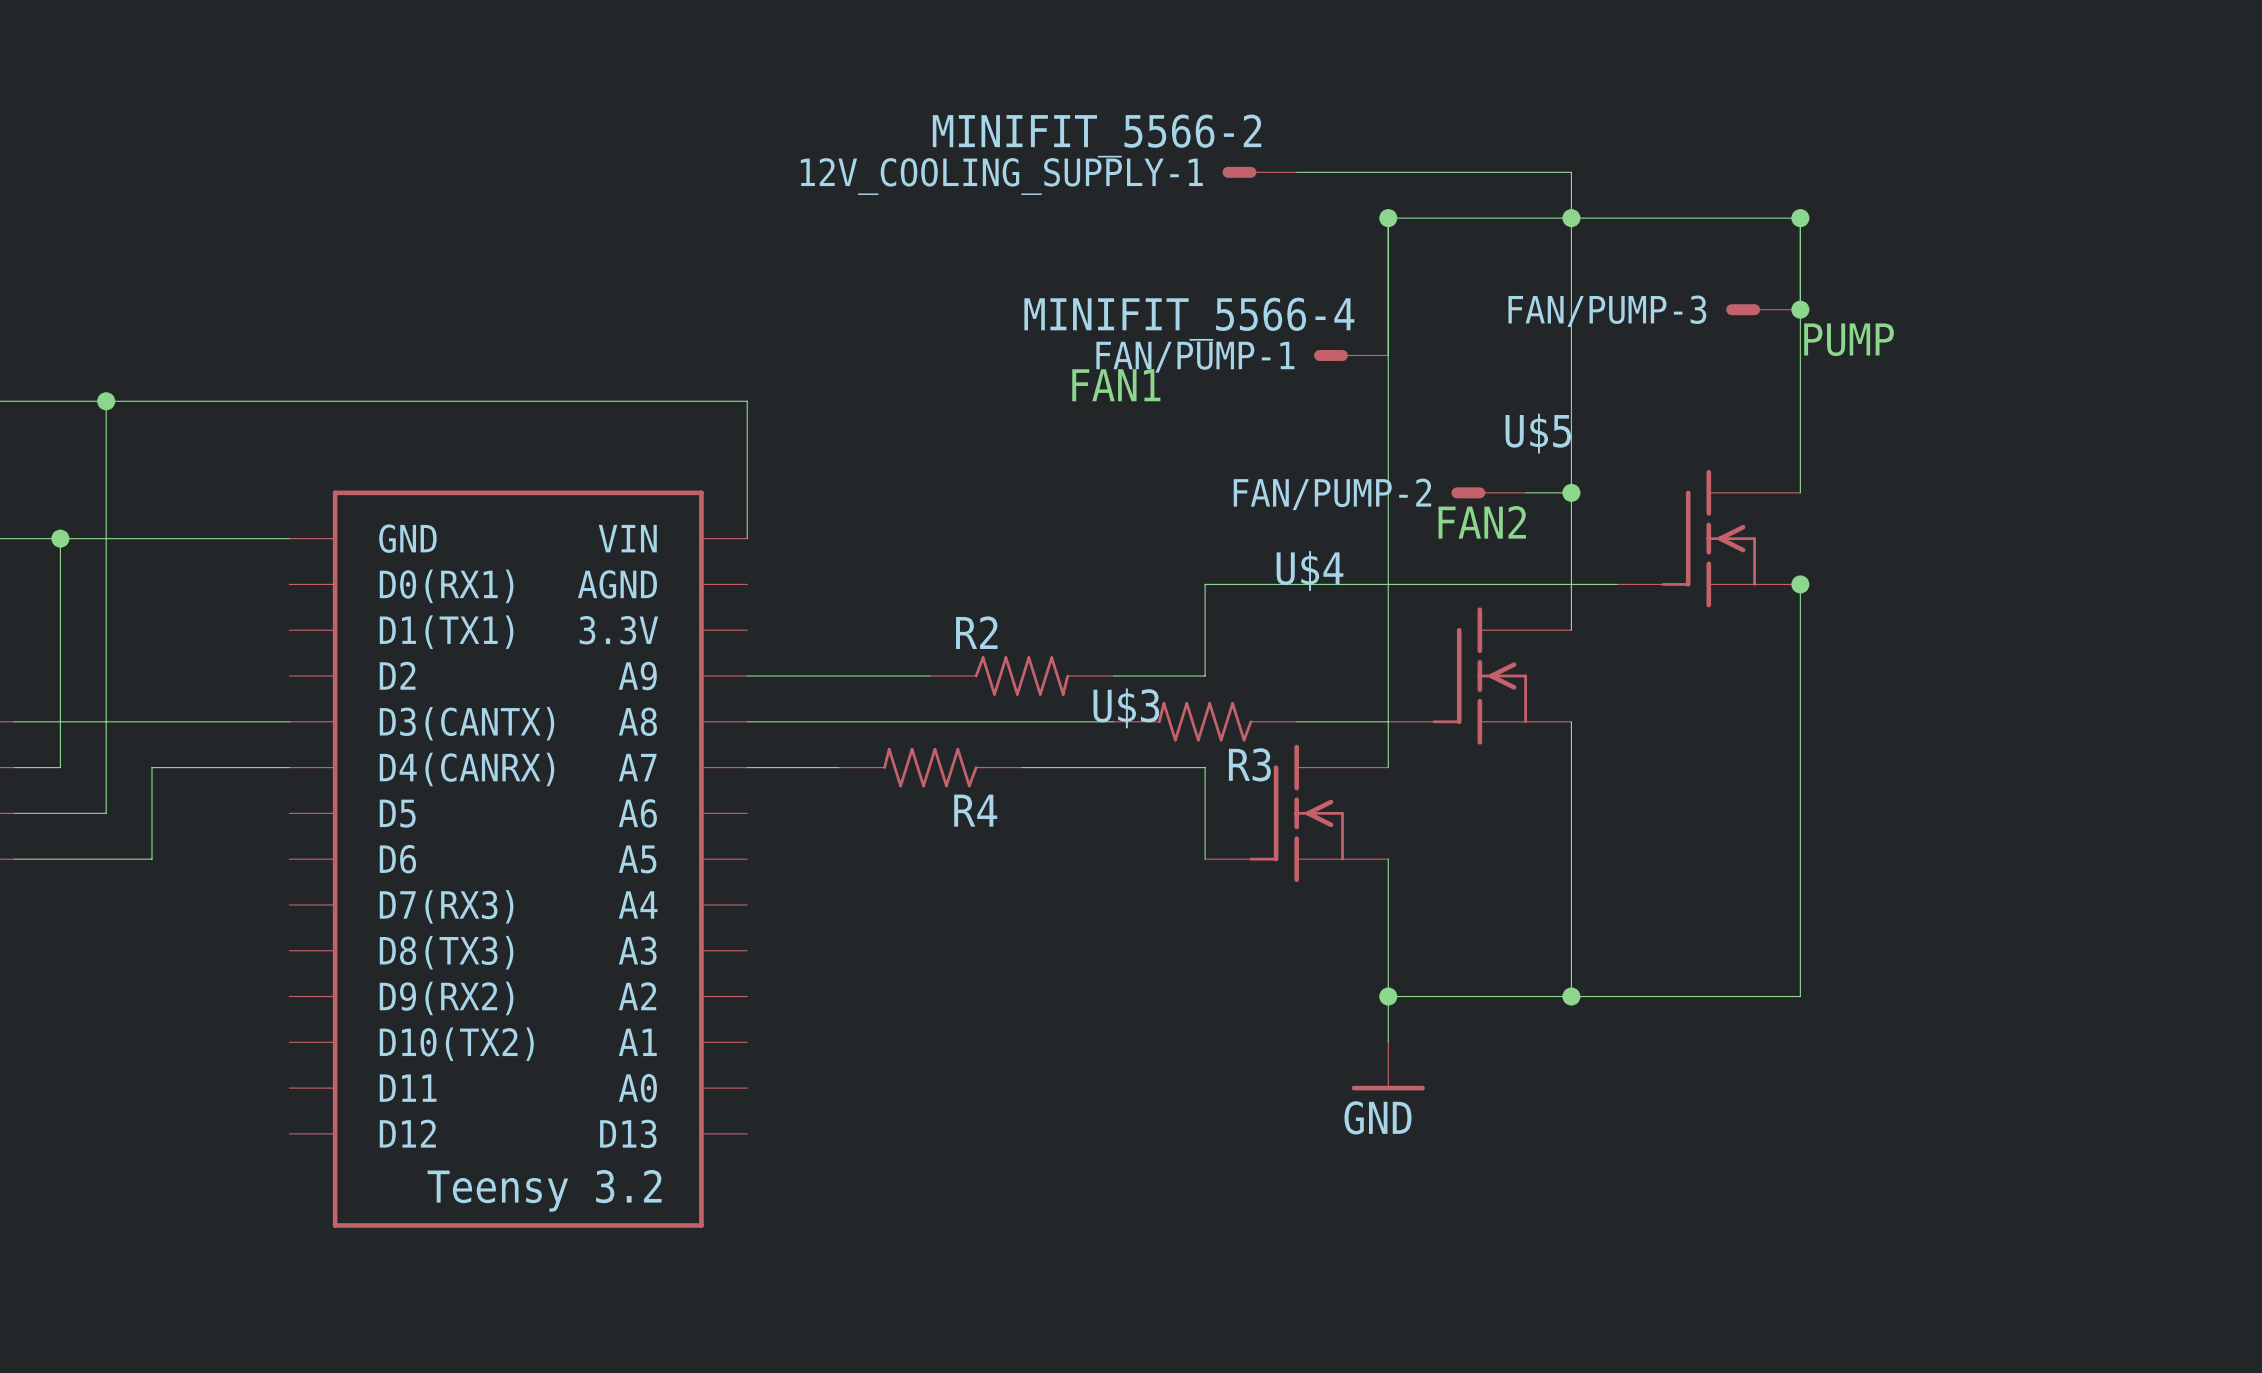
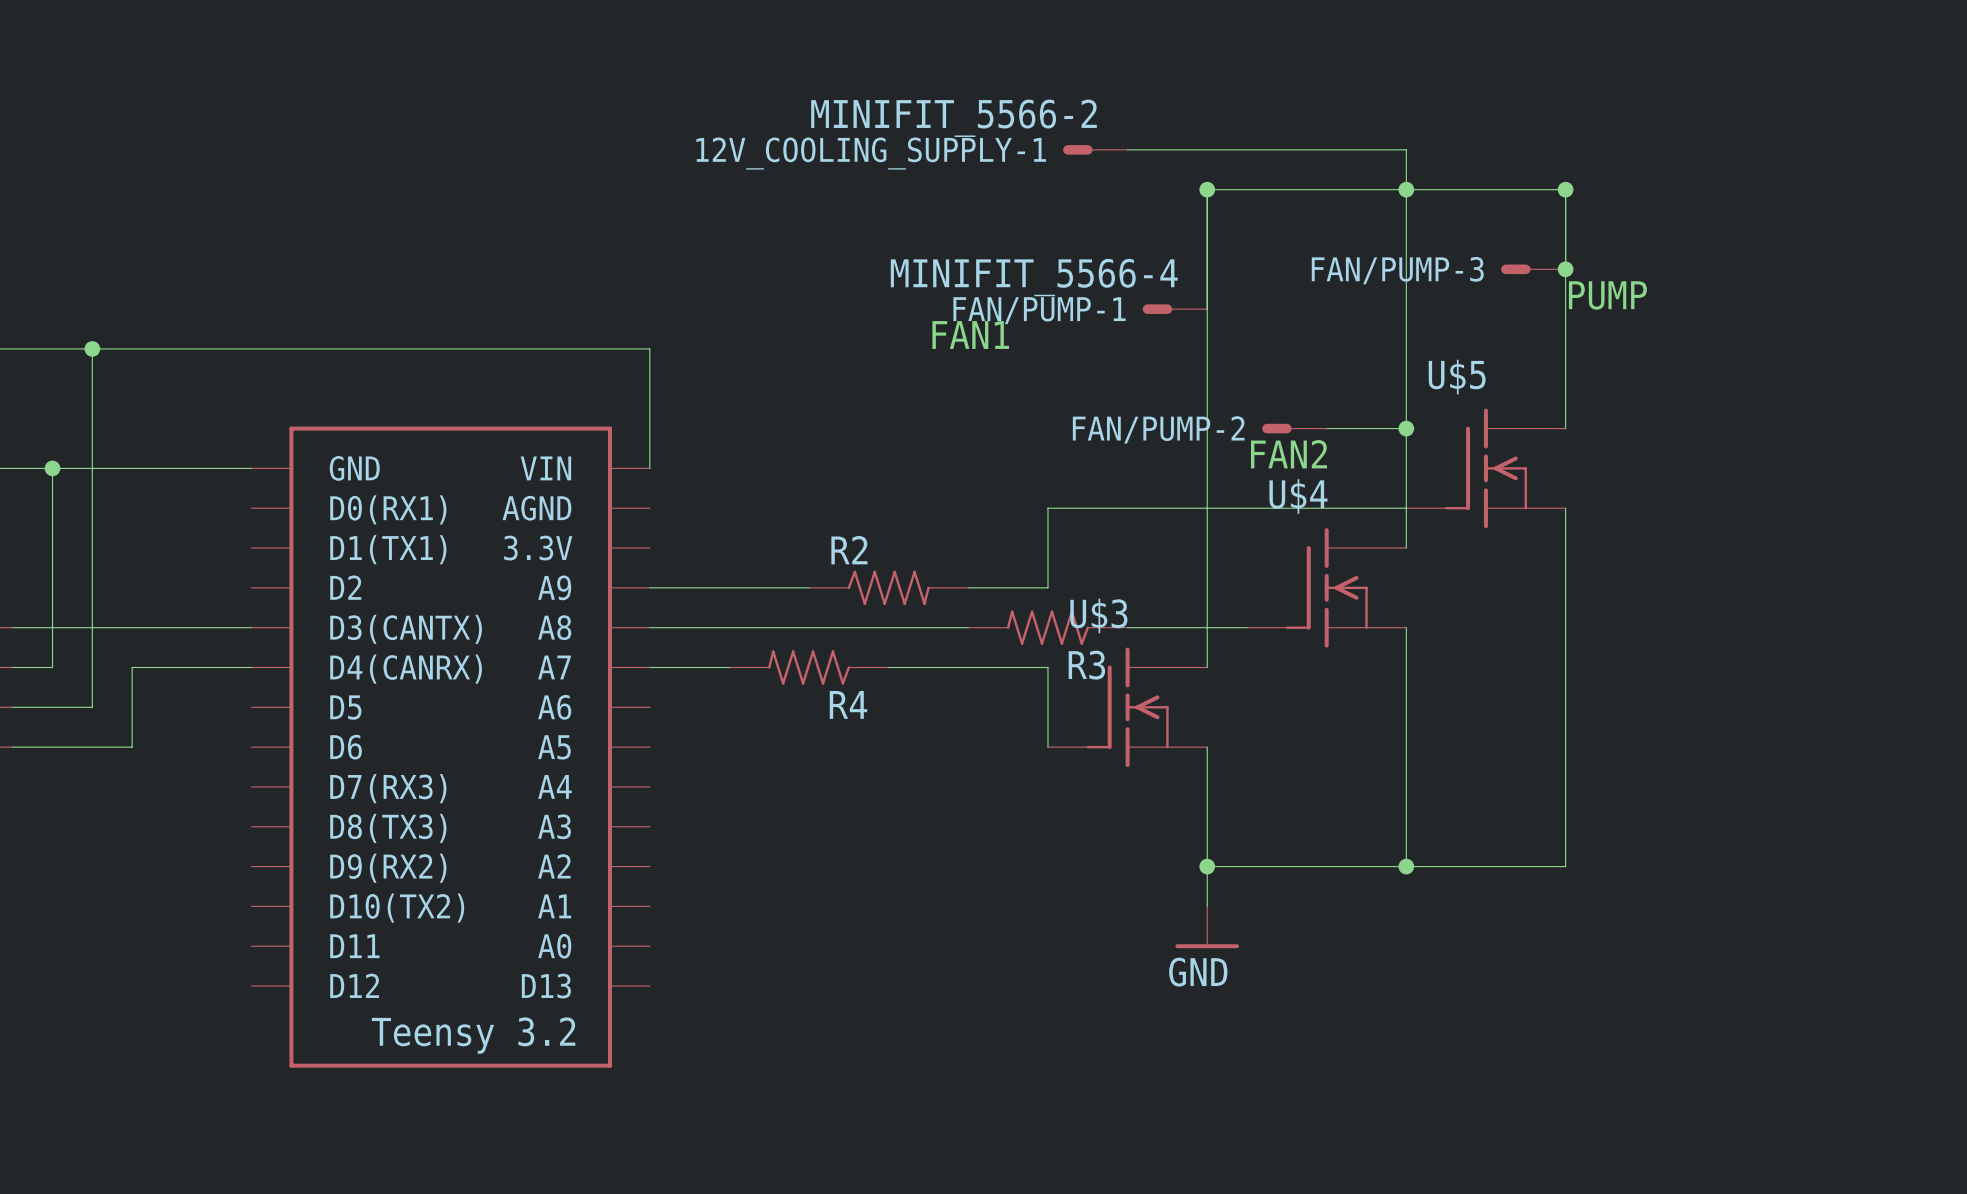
wire: (1571, 172) (1571, 630) -> (1366, 149) (1406, 149) (1406, 548)
junction position: (1571, 218) -> (1406, 189)
U$5 name position: U$5 (1538, 433) -> U$5 (1457, 377)
wire: none -> (1366, 428) (1406, 428)
junction position: (1571, 492) -> (1406, 428)
U$4 name position: U$4 (1310, 570) -> U$4 (1298, 496)
junction: (1800, 584) -> none
U$4 position: (1479, 676) -> (1326, 587)
U$3 name position: U$3 (1126, 708) -> U$3 (1098, 615)
wire: (1571, 721) (1571, 996) -> (1406, 627) (1406, 866)
junction position: (1571, 996) -> (1406, 866)

